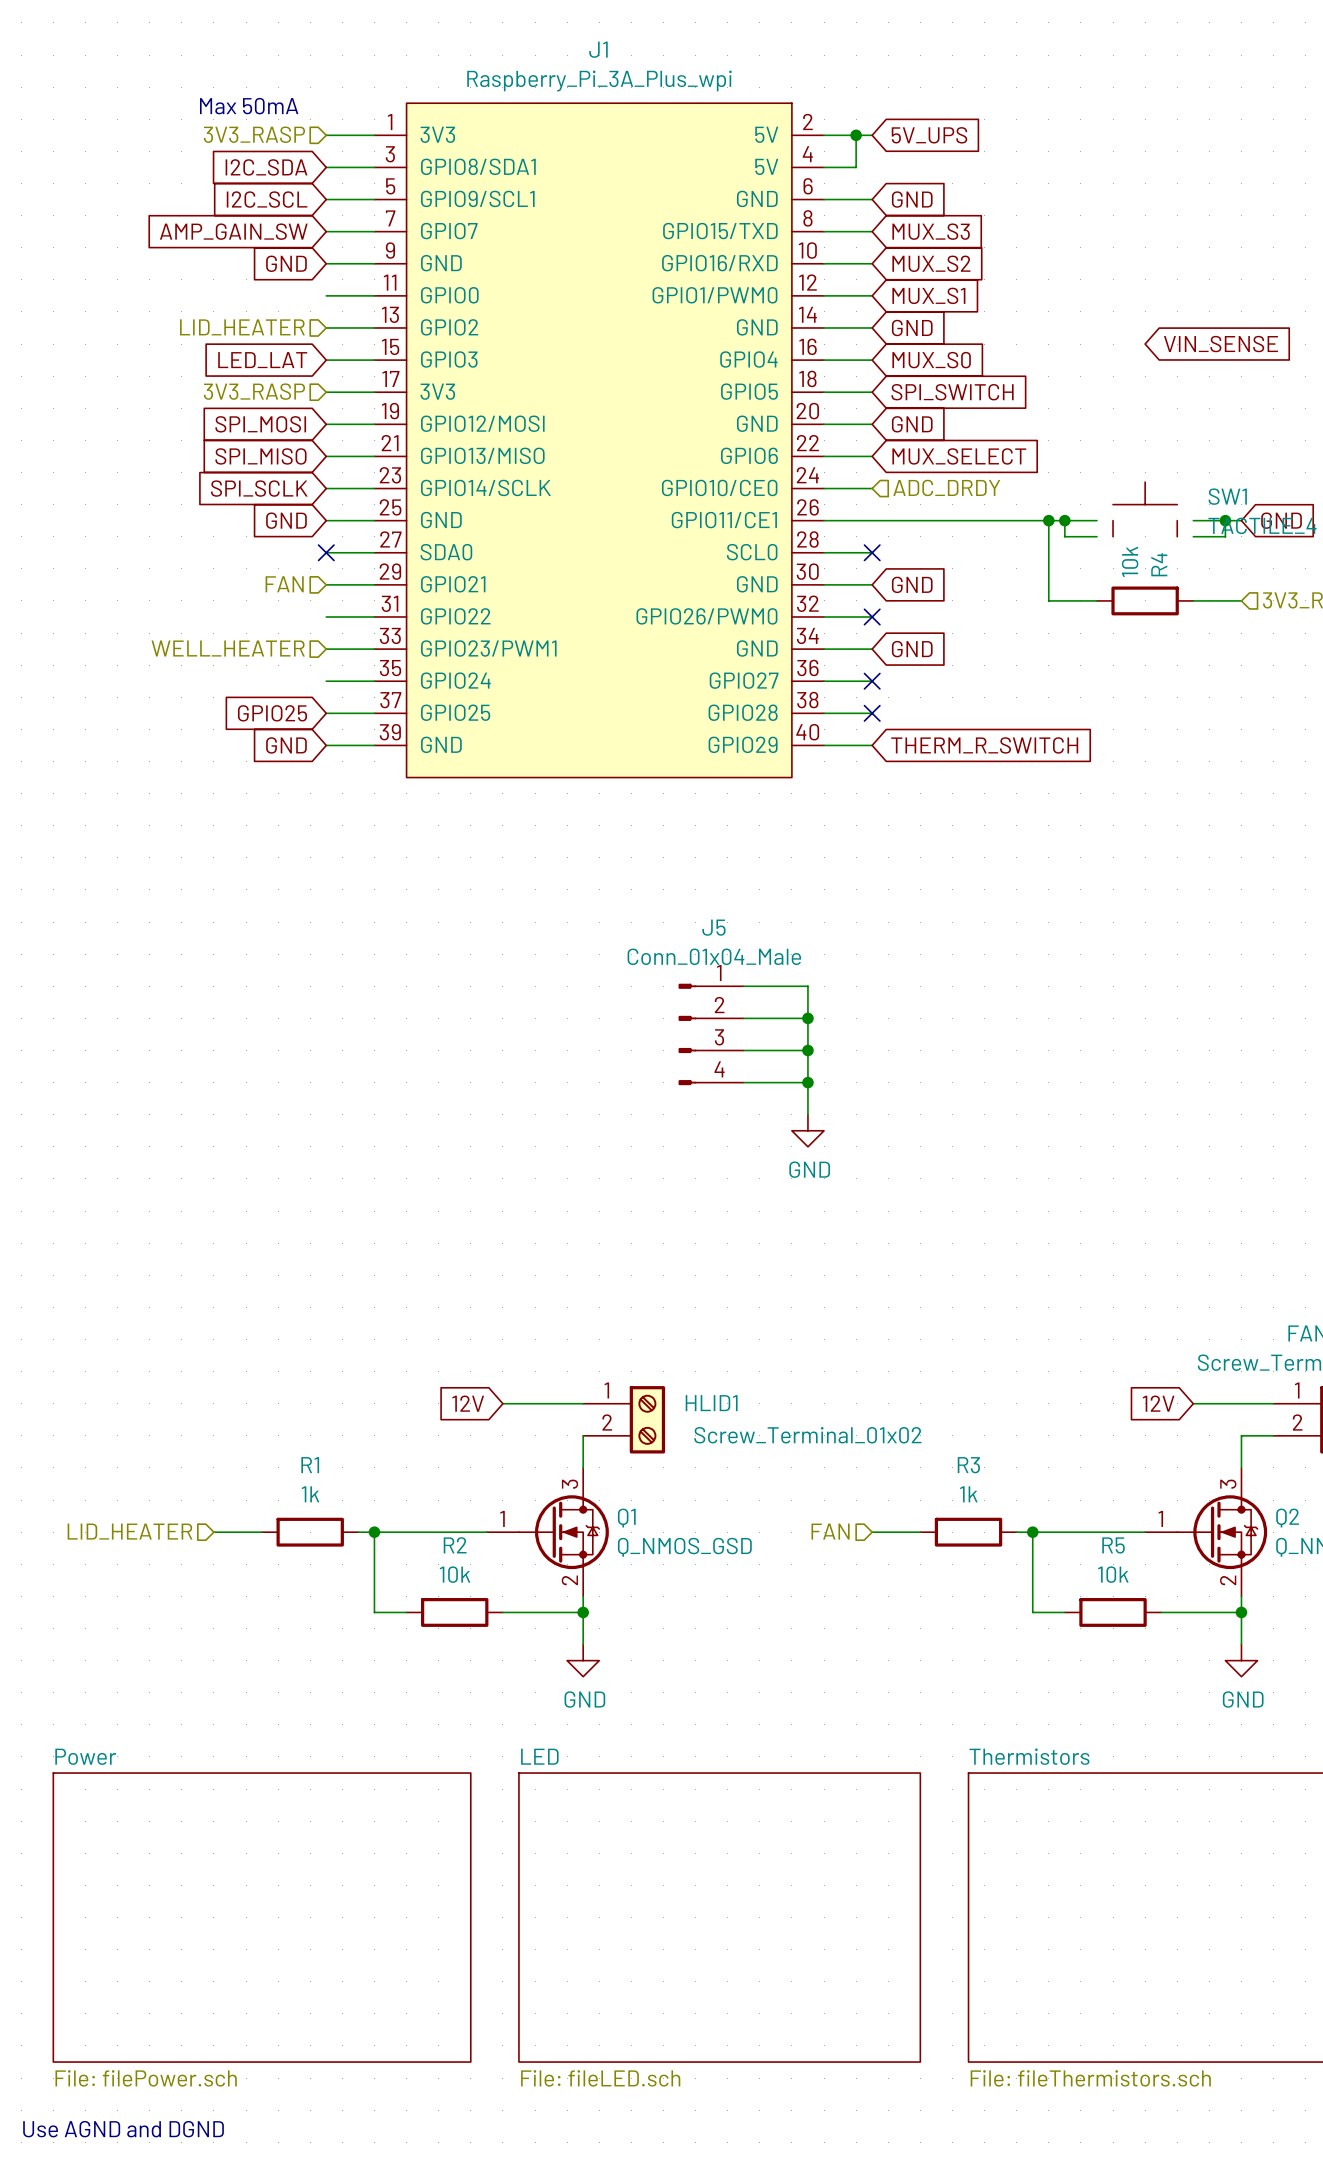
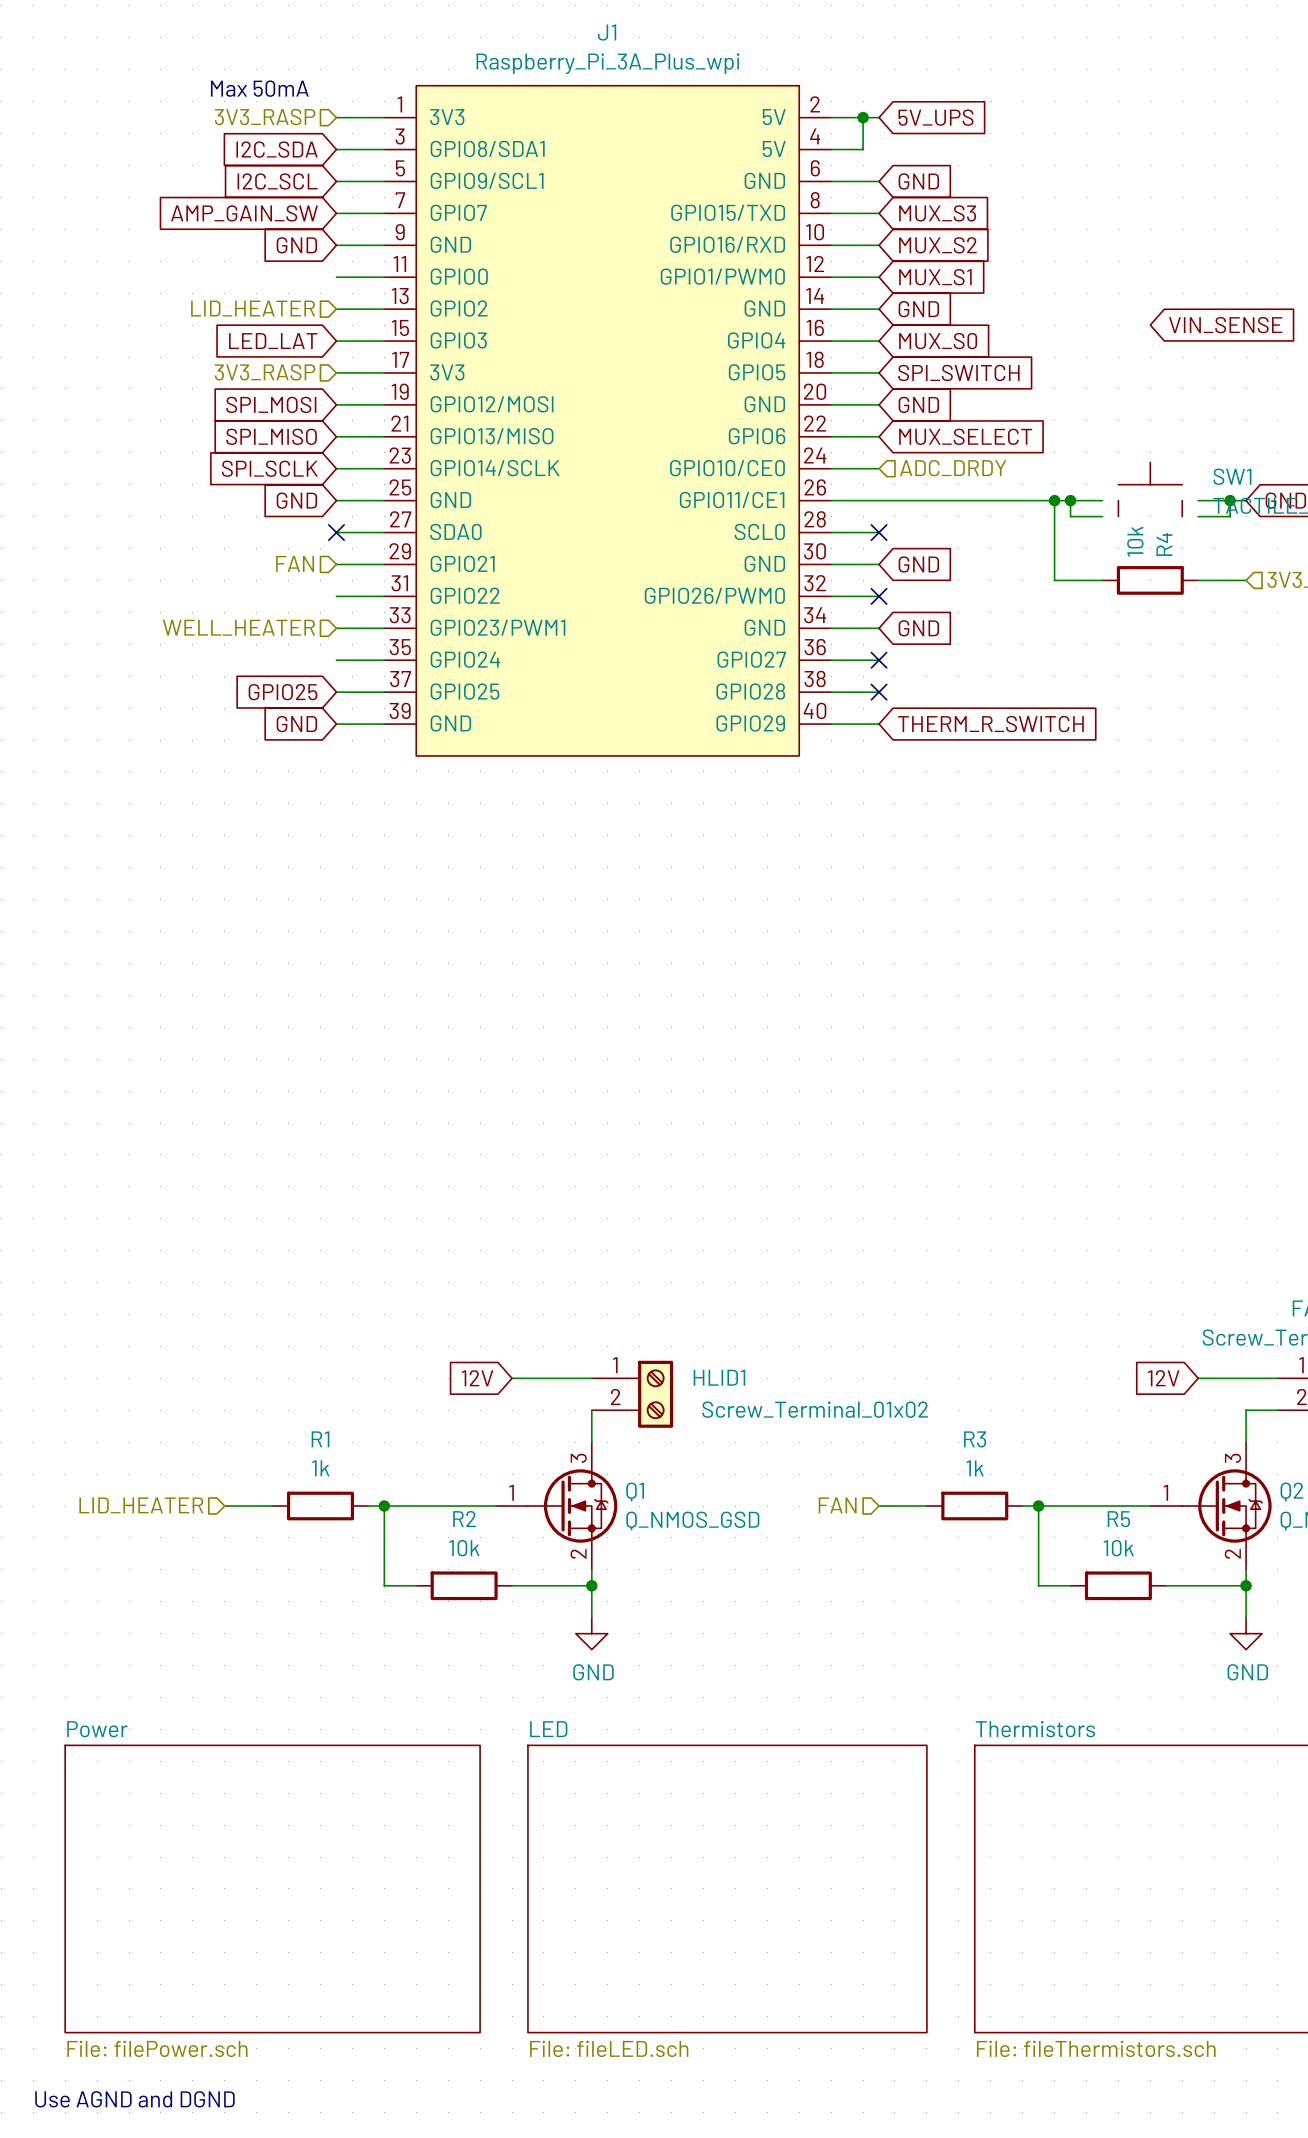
wire: (743, 986) (807, 986) (807, 1114) -> none
wire: (743, 1018) (807, 1018) -> none
junction: (807, 1018) -> none
J5: Conn_01x04_Male (711, 1034) -> none
wire: (743, 1050) (807, 1050) -> none
junction: (807, 1050) -> none
wire: (743, 1082) (807, 1082) -> none
junction: (807, 1082) -> none
power symbol: GND (807, 1130) -> none

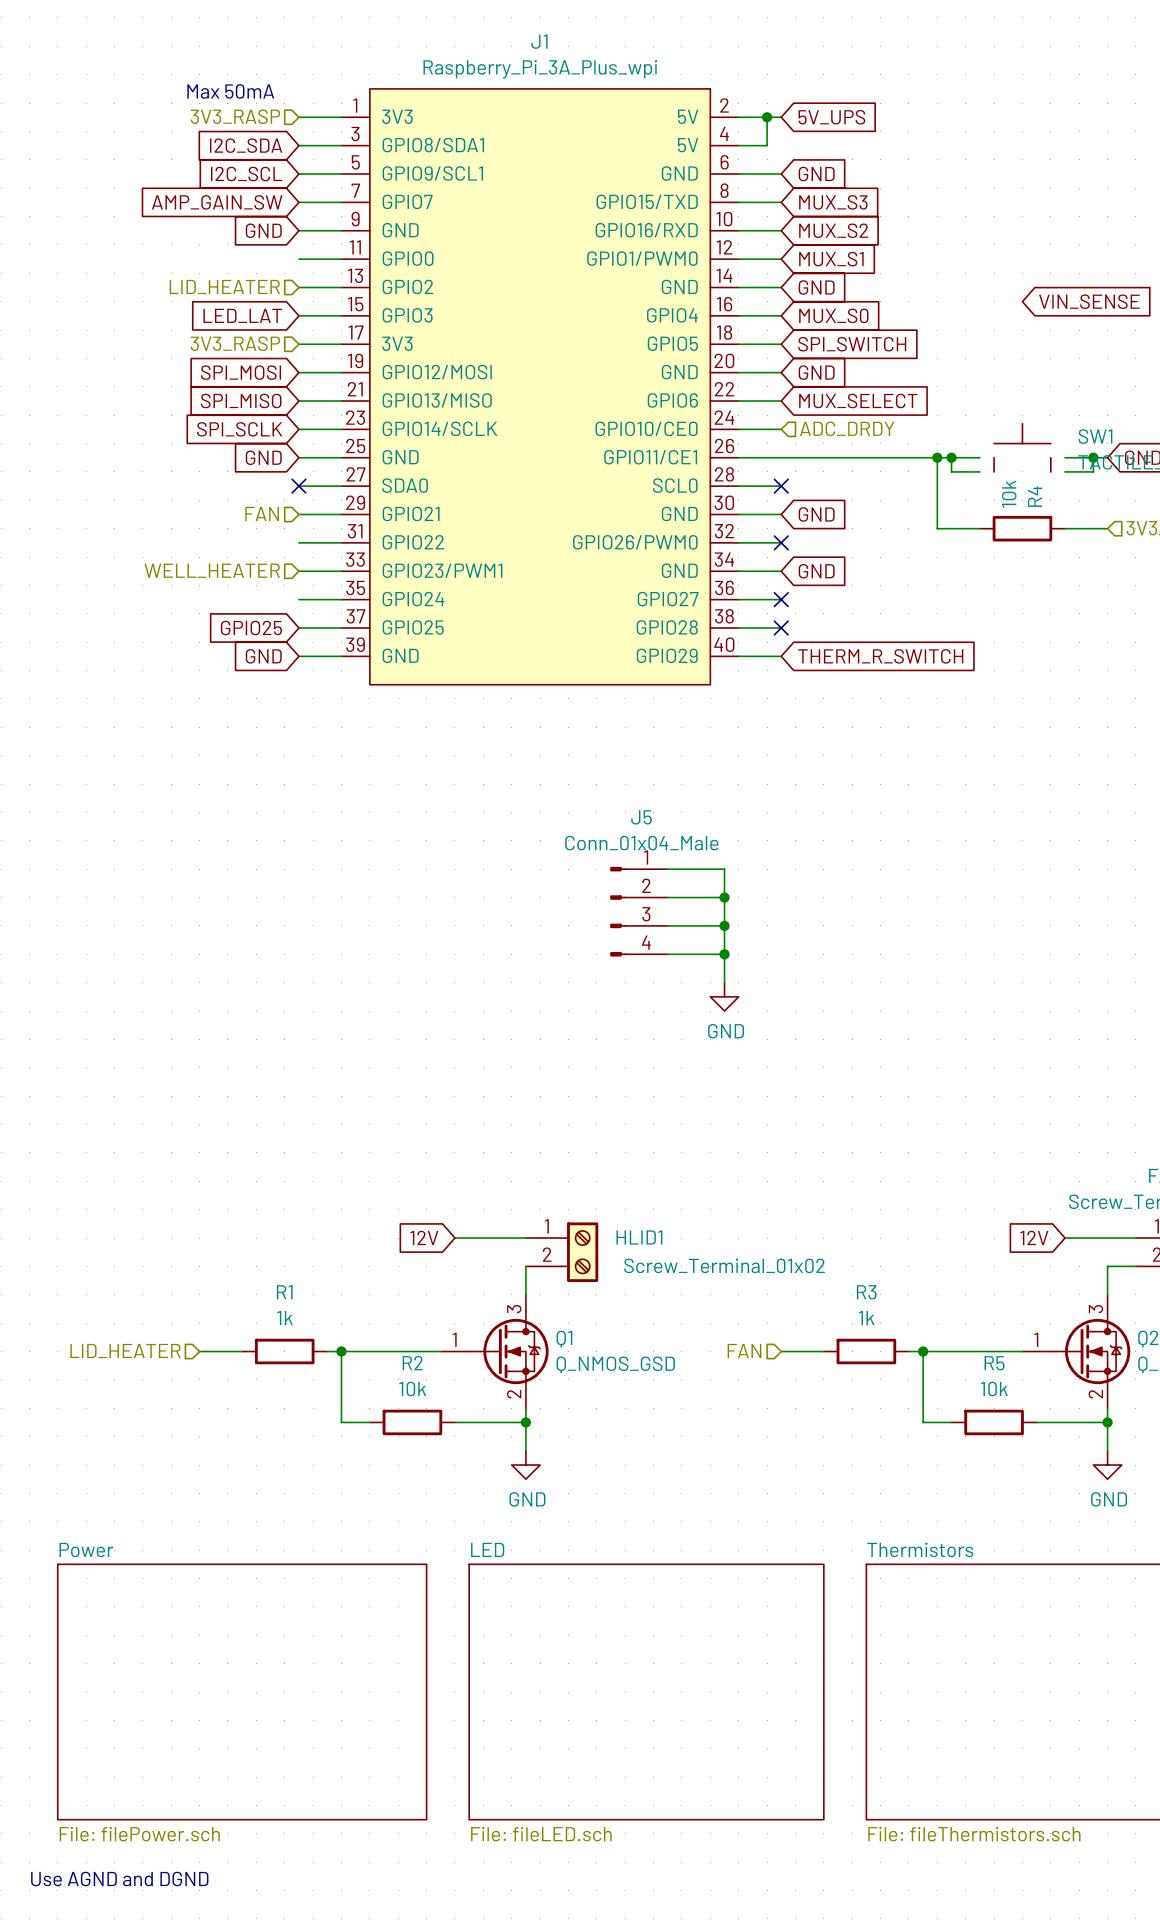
wire: none -> (667, 869) (724, 869) (724, 982)
wire: none -> (667, 897) (724, 897)
junction: none -> (724, 897)
J5: none -> Conn_01x04_Male (638, 911)
wire: none -> (667, 925) (724, 925)
junction: none -> (724, 925)
wire: none -> (667, 954) (724, 954)
junction: none -> (724, 954)
power symbol: none -> GND (724, 996)

